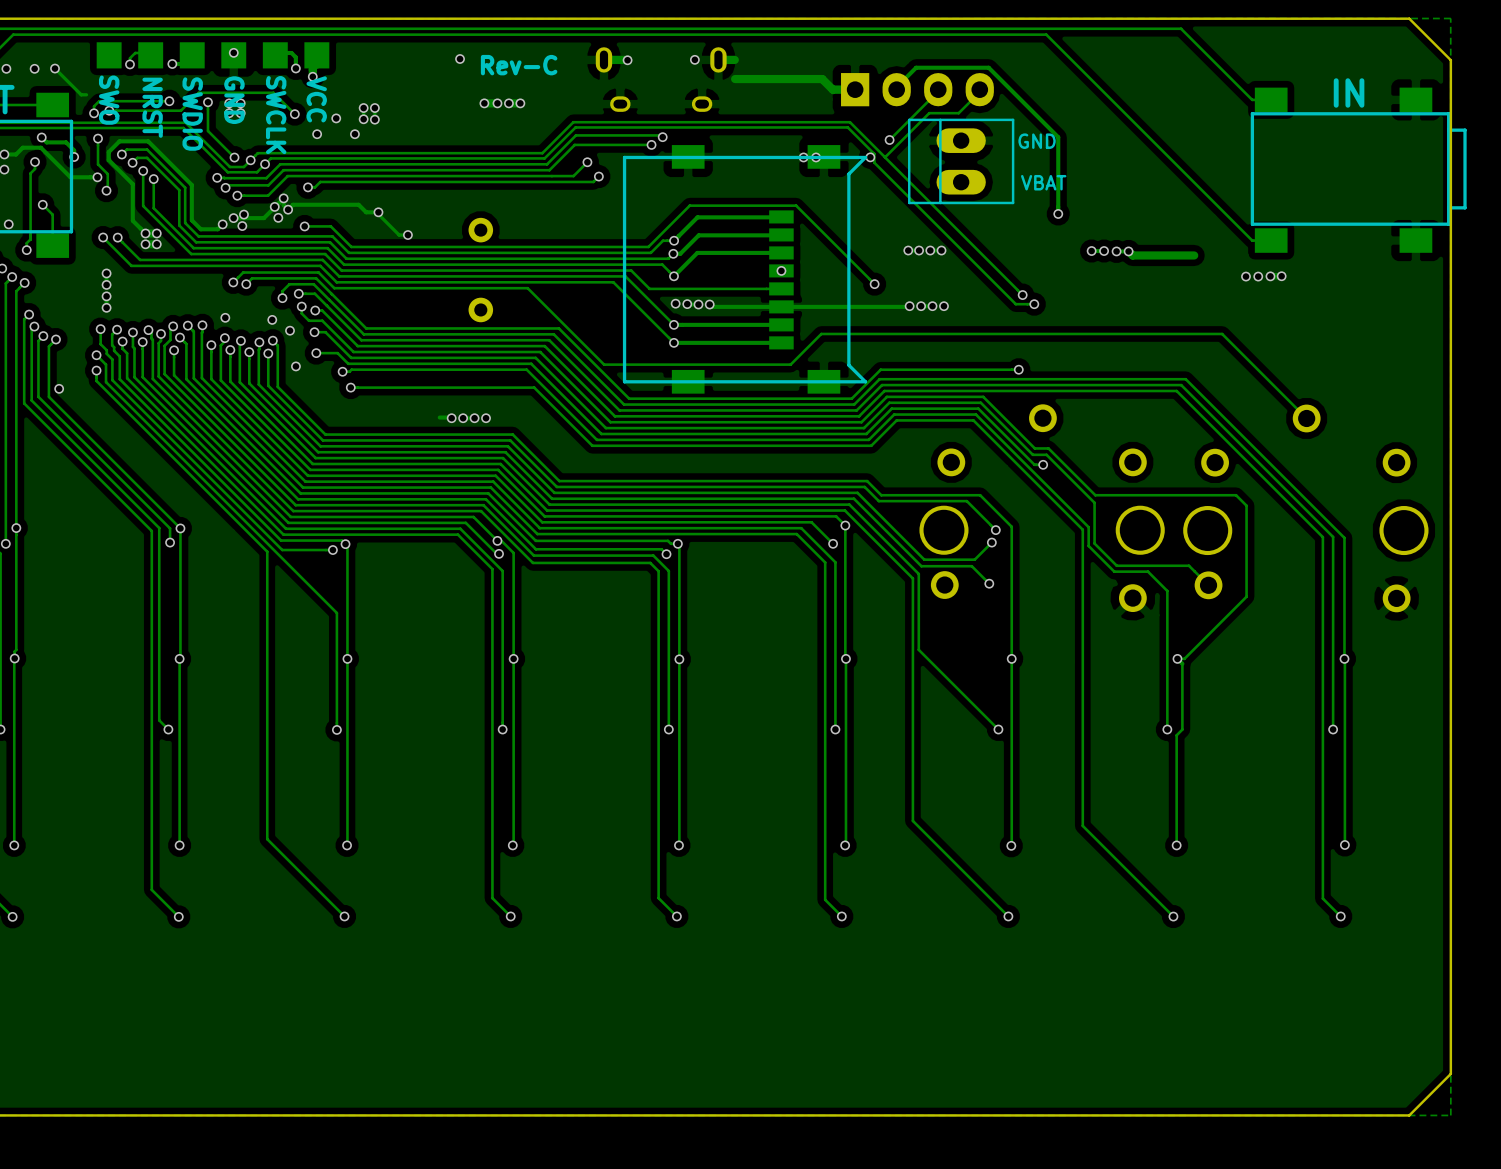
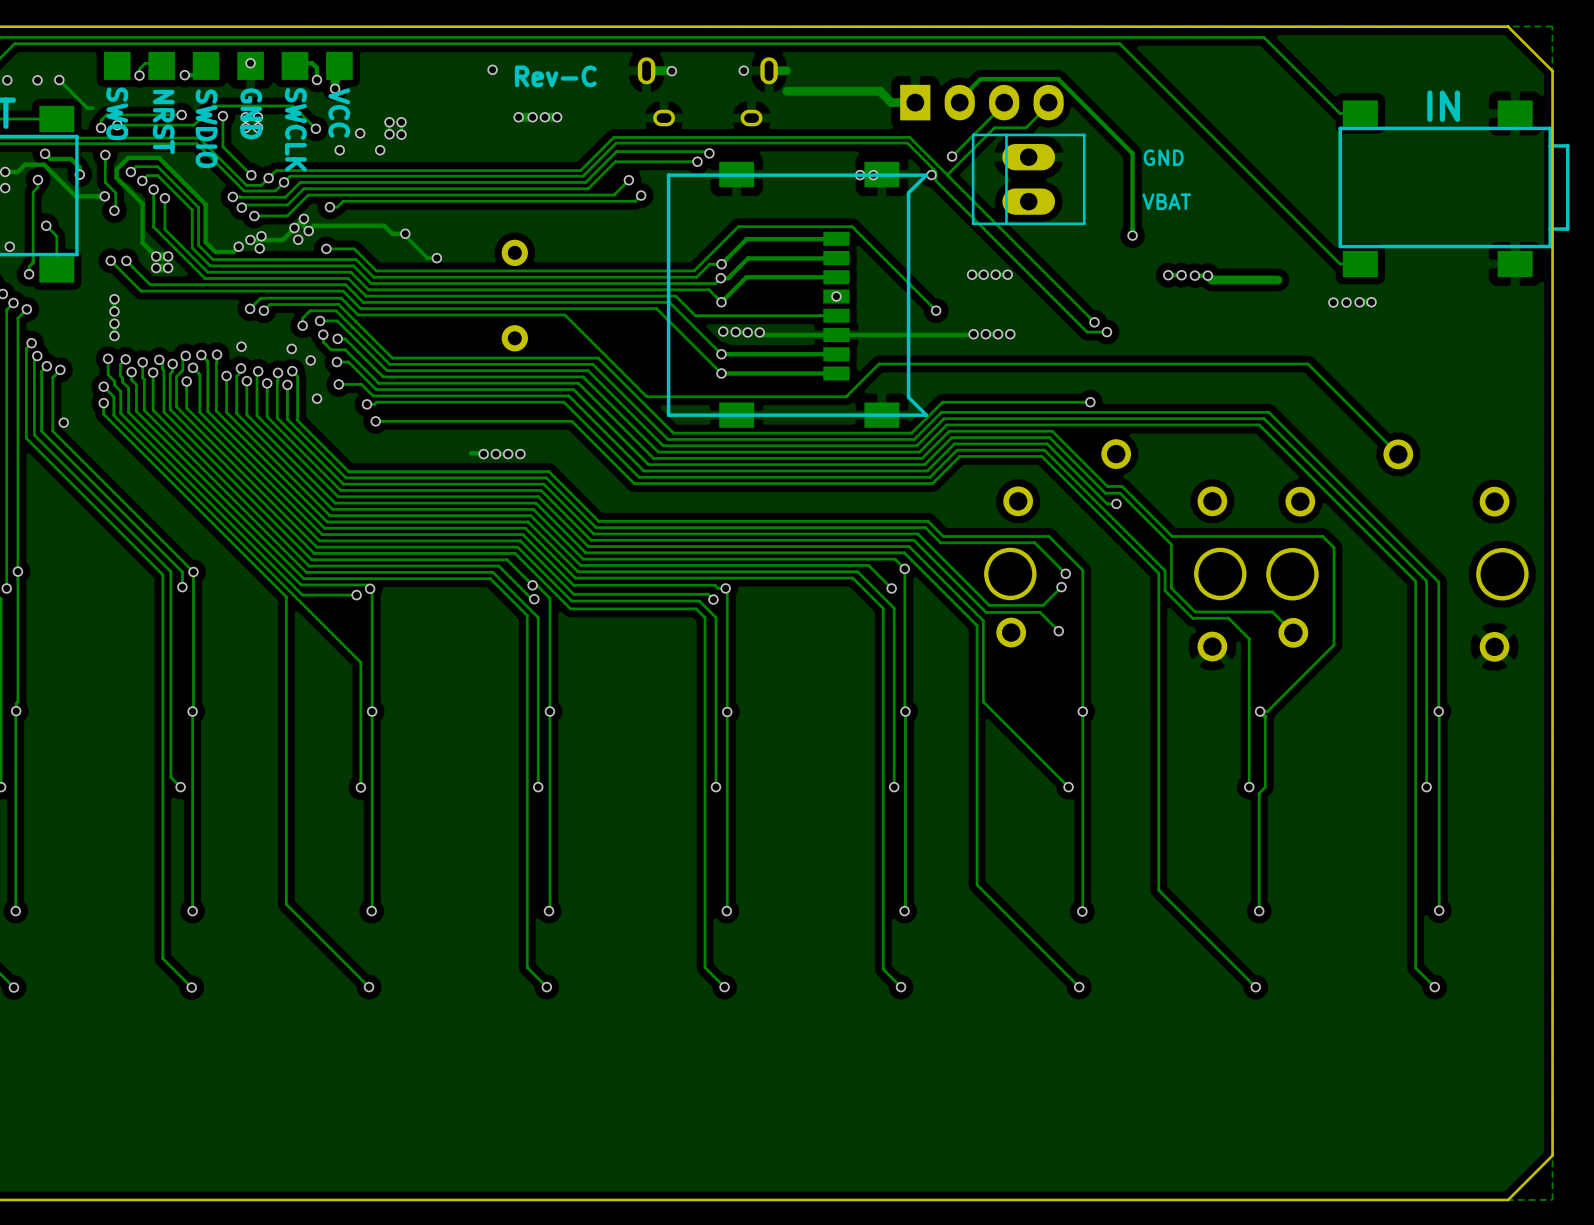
text position: GND (1037, 141) -> GND (1163, 157)
text position: VBAT (1043, 182) -> VBAT (1166, 201)

